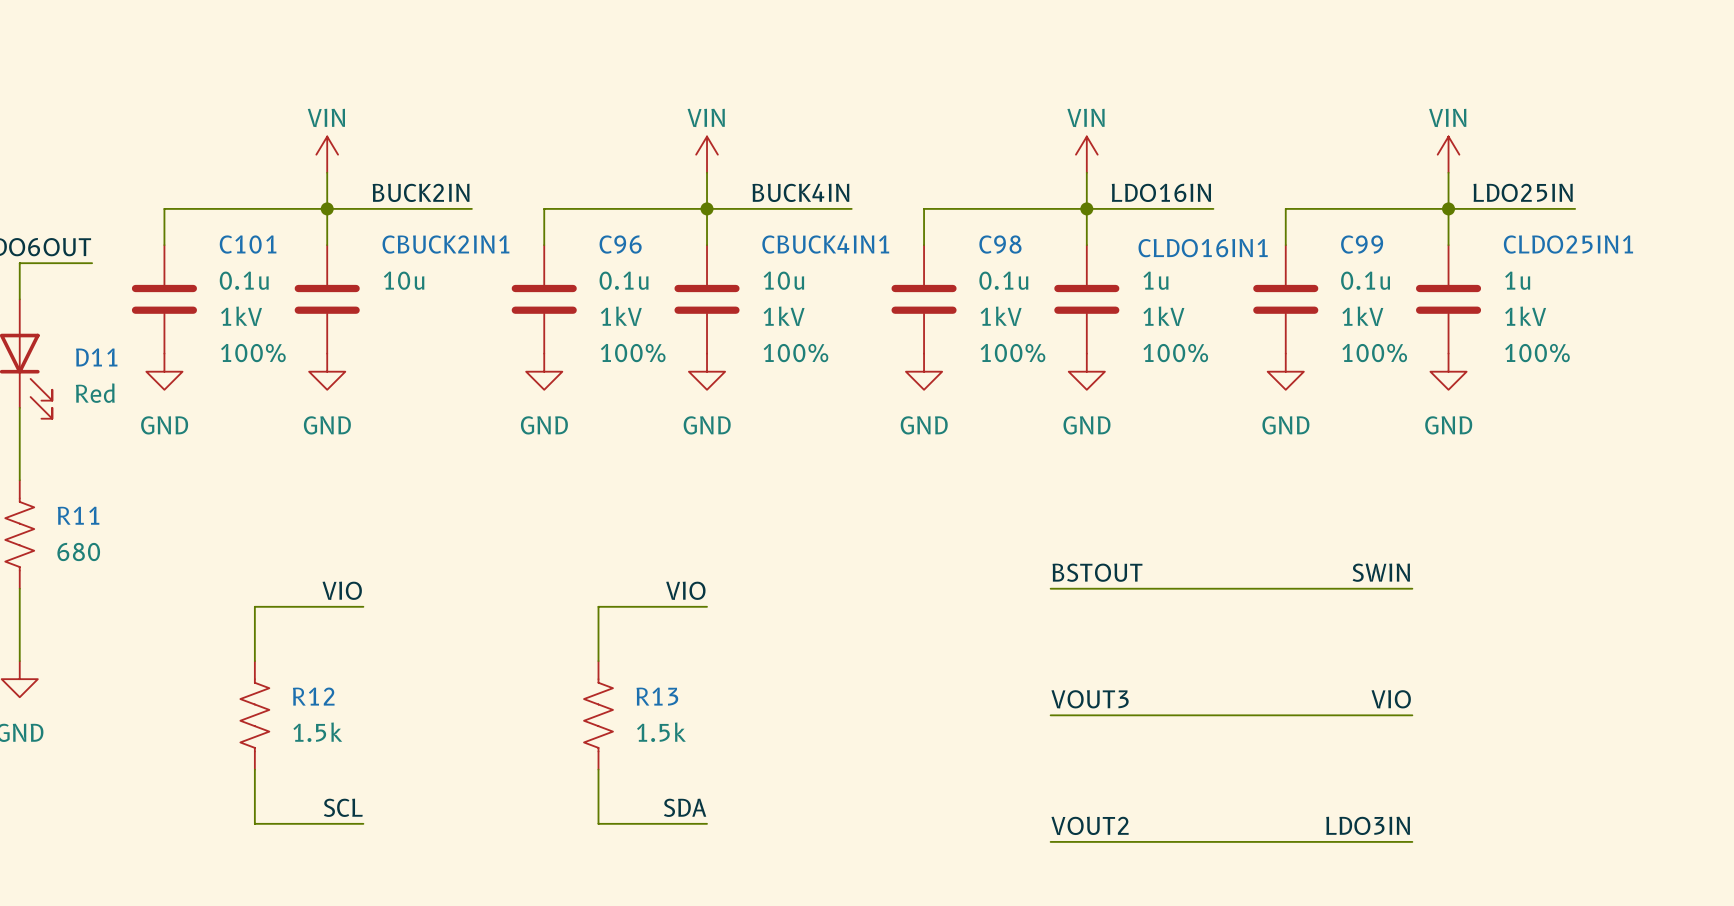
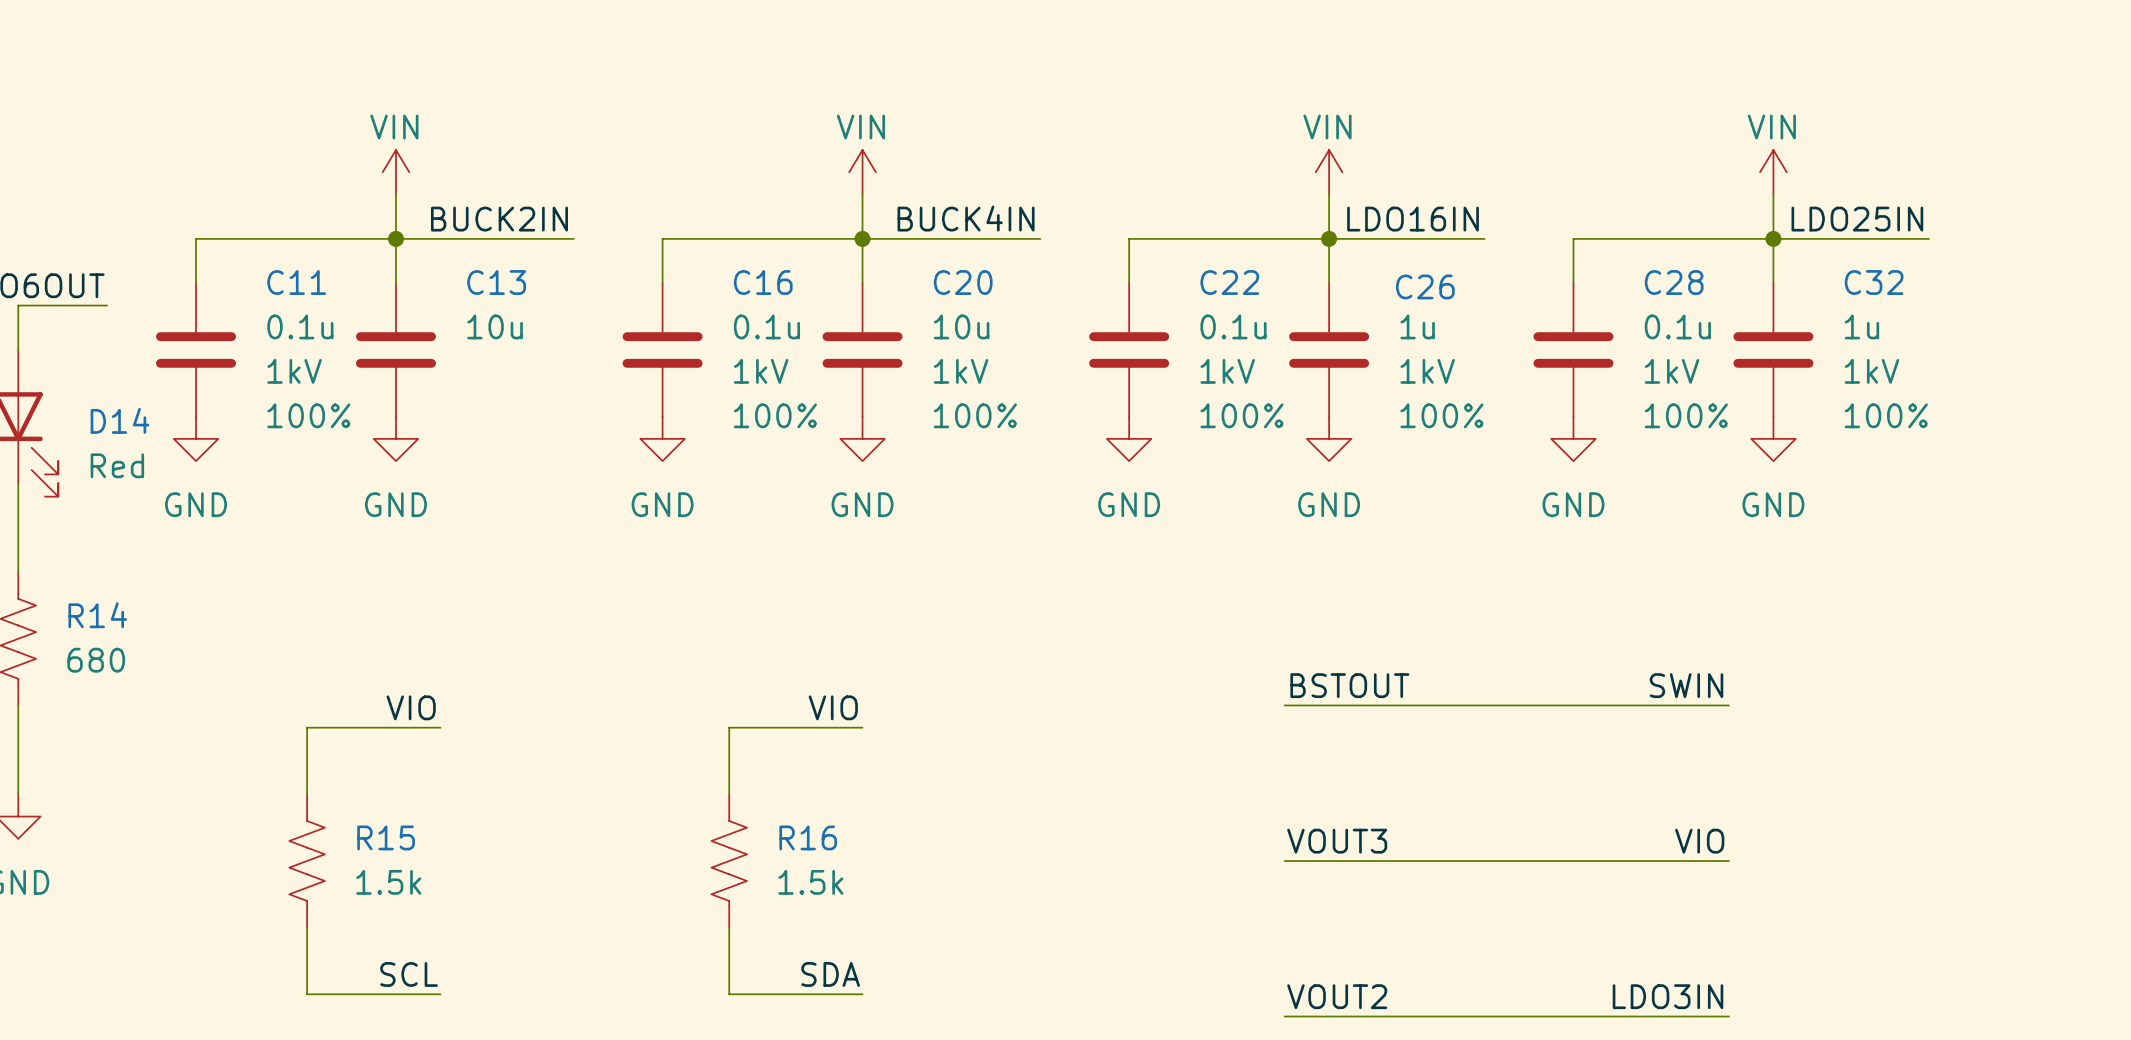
C101 name: C101 (248, 244) -> C11 (296, 282)
CBUCK2IN1 name: CBUCK2IN1 (445, 244) -> C13 (496, 282)
C96 name: C96 (620, 244) -> C16 (763, 282)
CBUCK4IN1 name: CBUCK4IN1 (825, 244) -> C20 (963, 282)
C98 name: C98 (1000, 244) -> C22 (1229, 282)
C99 name: C99 (1362, 244) -> C28 (1674, 282)
CLDO25IN1 name: CLDO25IN1 (1568, 244) -> C32 (1874, 282)
CLDO16IN1 name: CLDO16IN1 (1203, 248) -> C26 (1425, 286)
D11 name: D11 (96, 357) -> D14 (120, 420)
R11 name: R11 (78, 515) -> R14 (97, 615)
R12 name: R12 (313, 696) -> R15 (386, 837)
R13 name: R13 (657, 696) -> R16 (808, 837)

